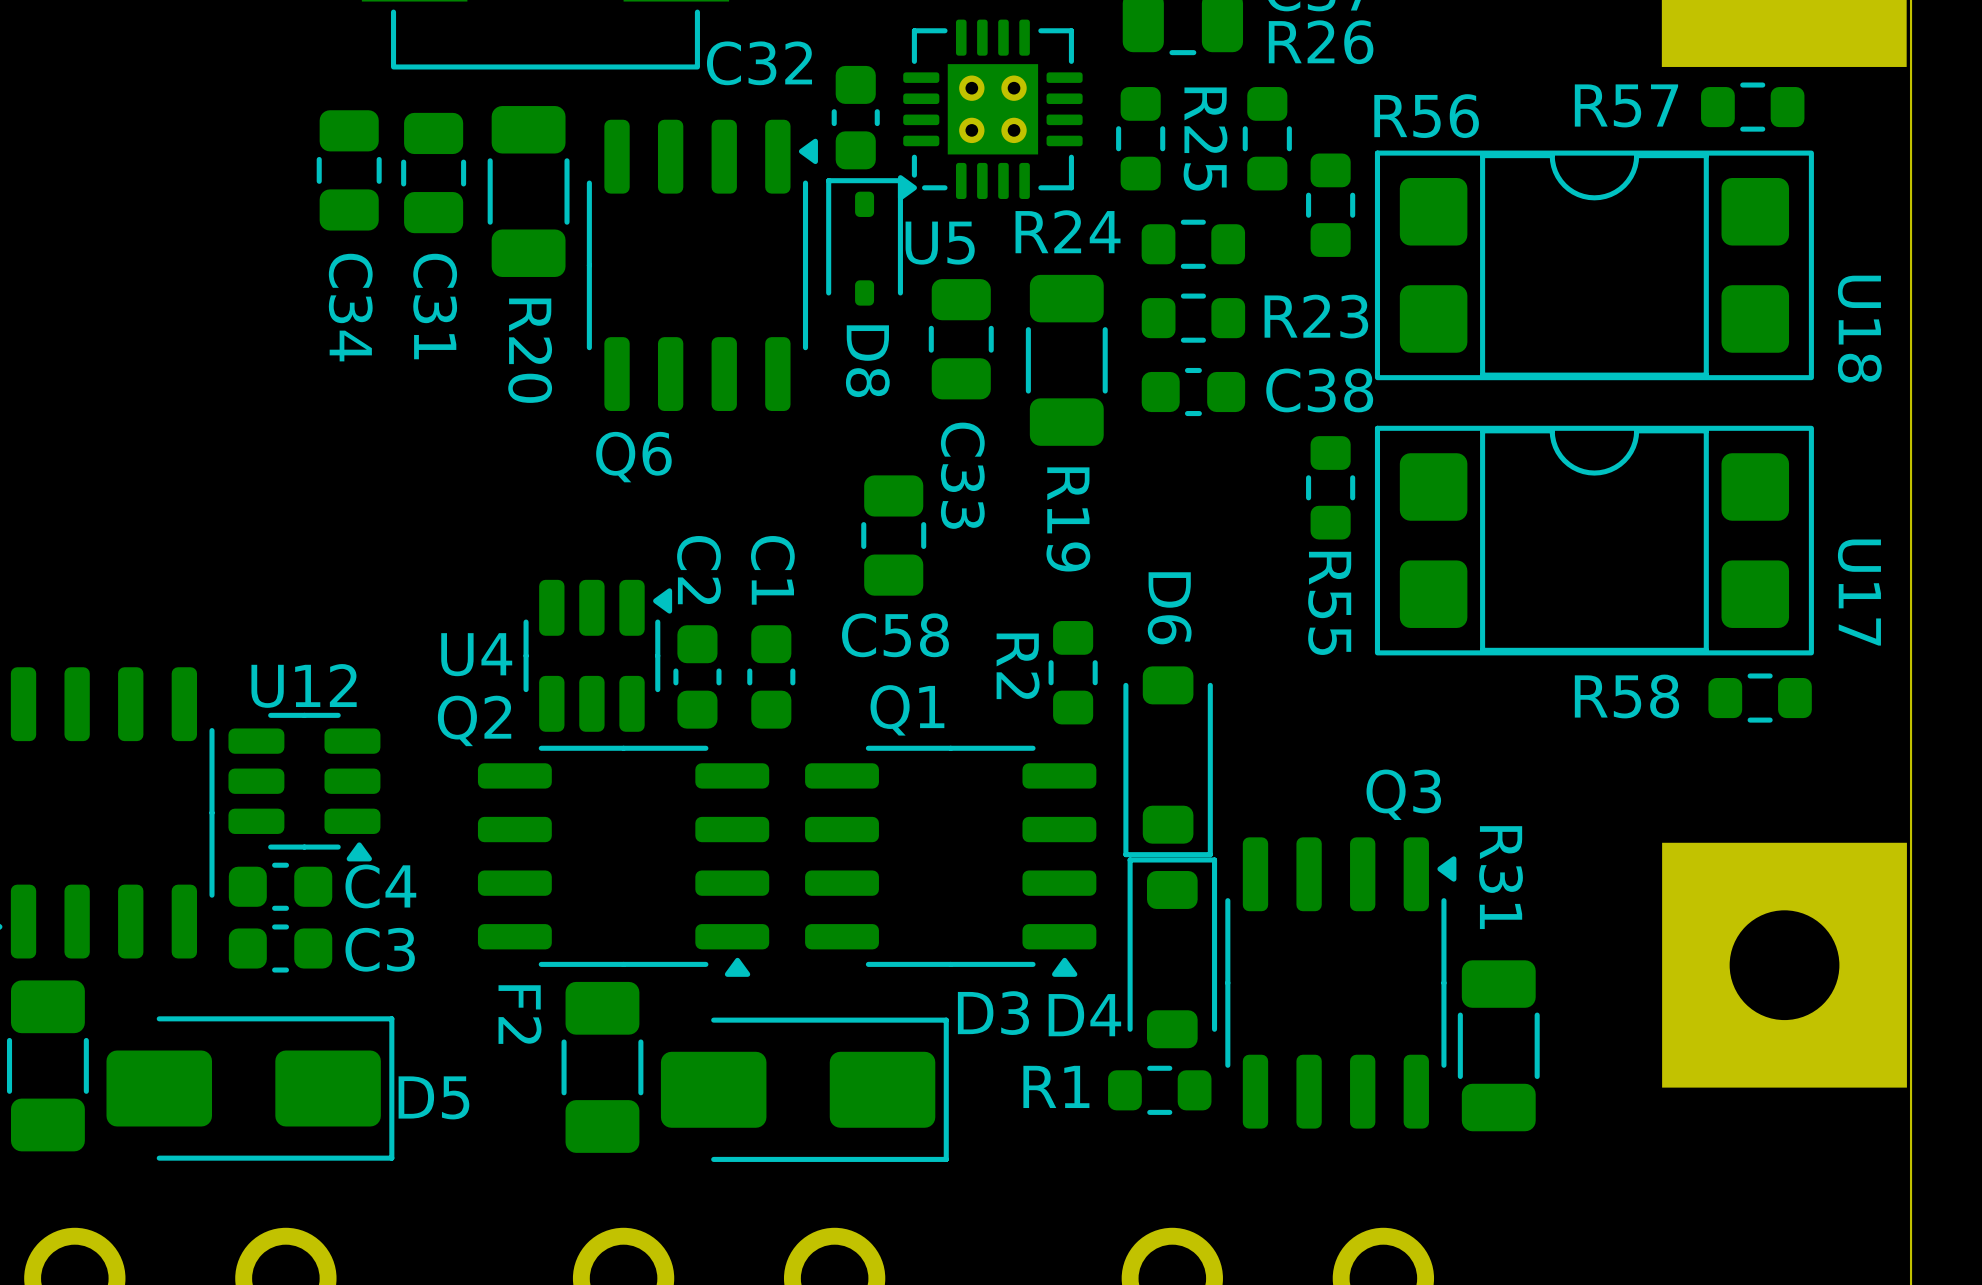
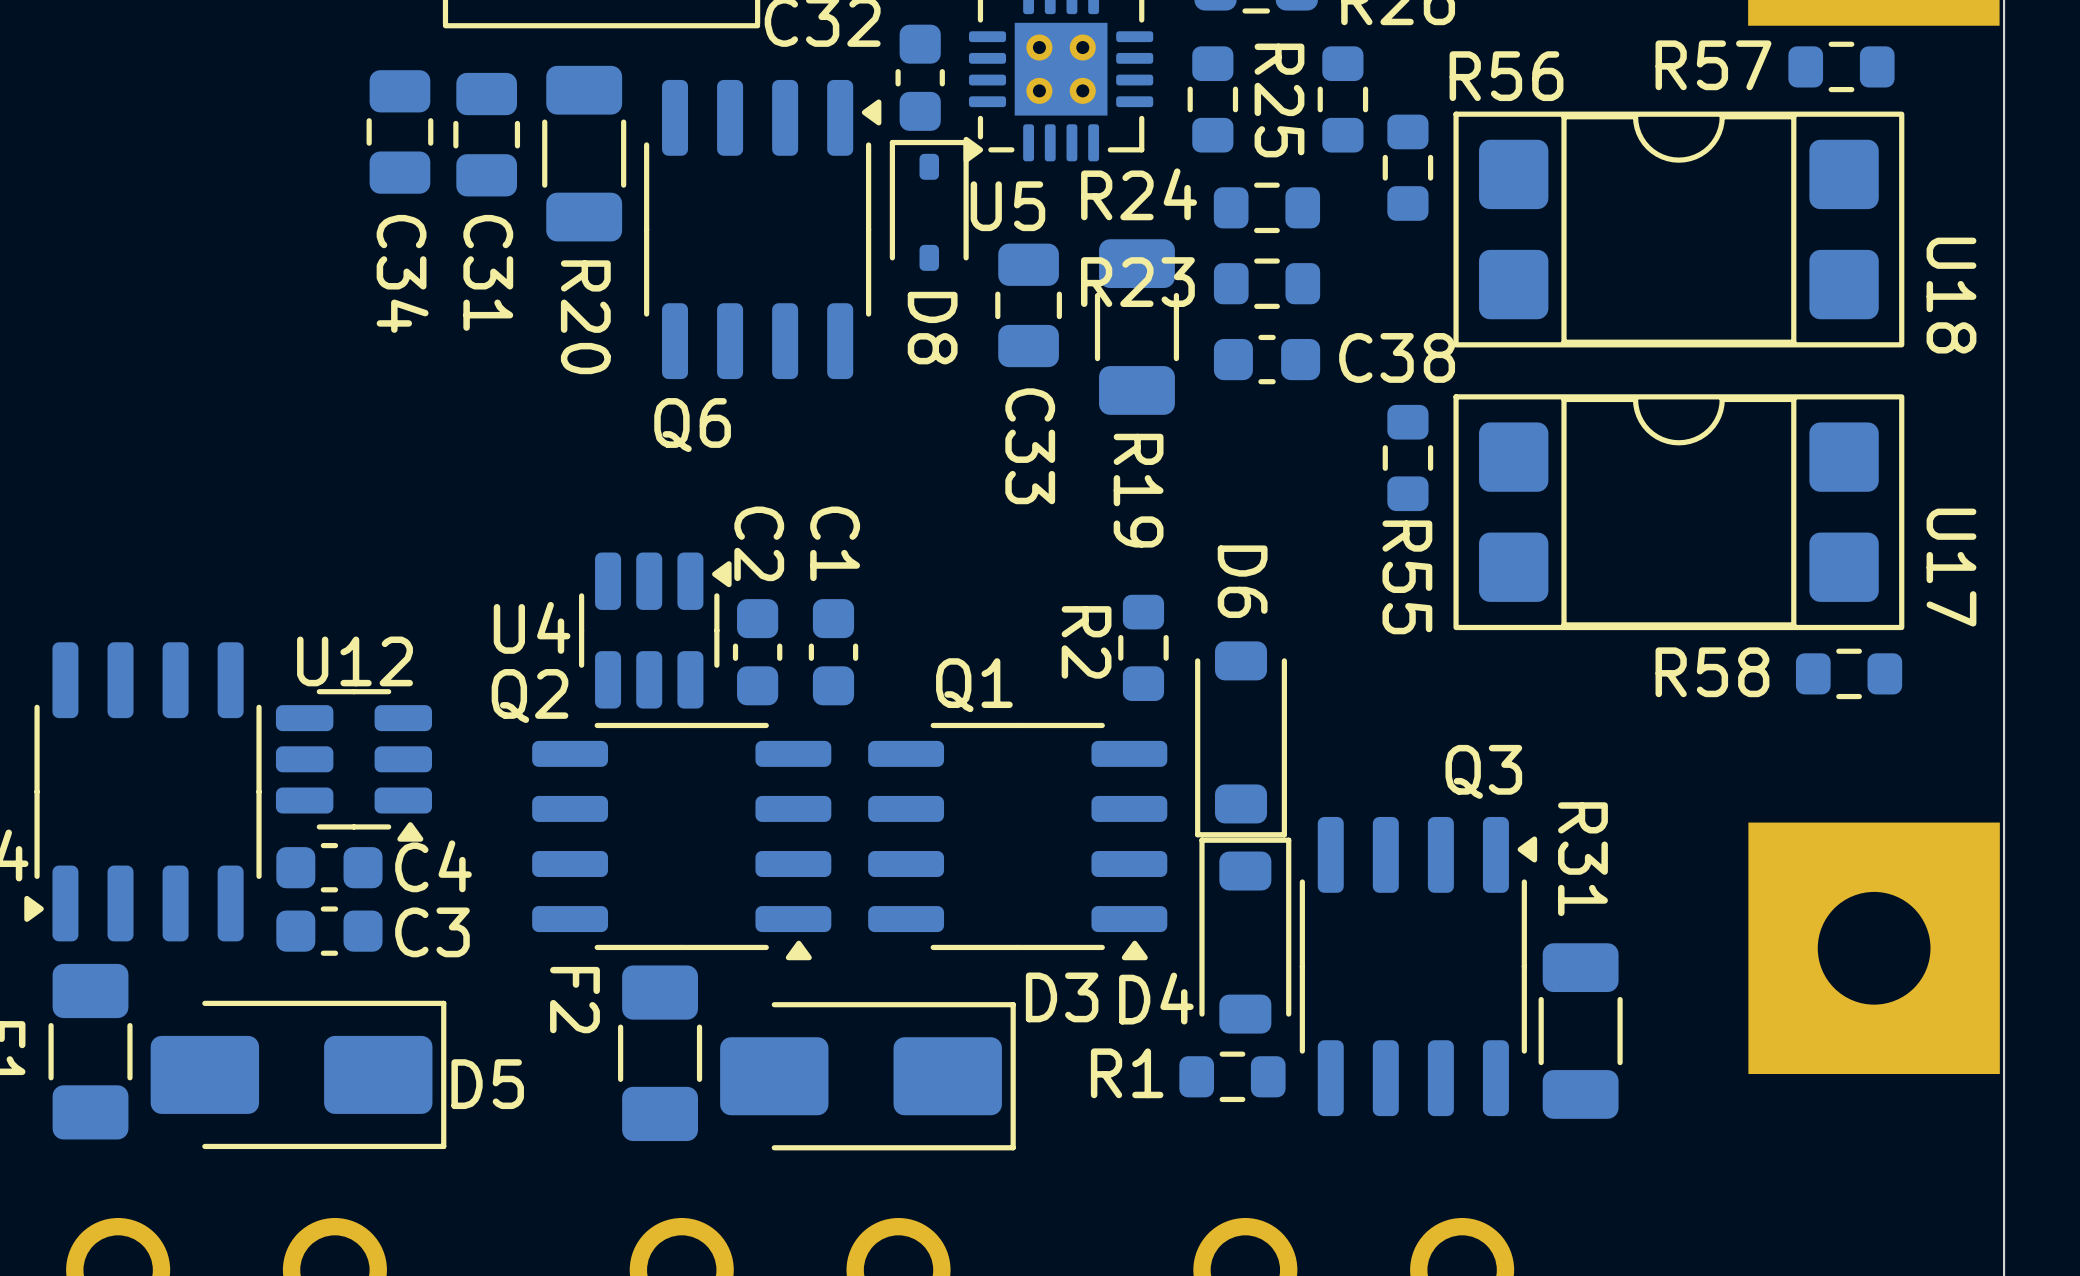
R23 name position: R23 (1316, 316) -> R23 (1137, 282)
C58: (893, 535) -> none

